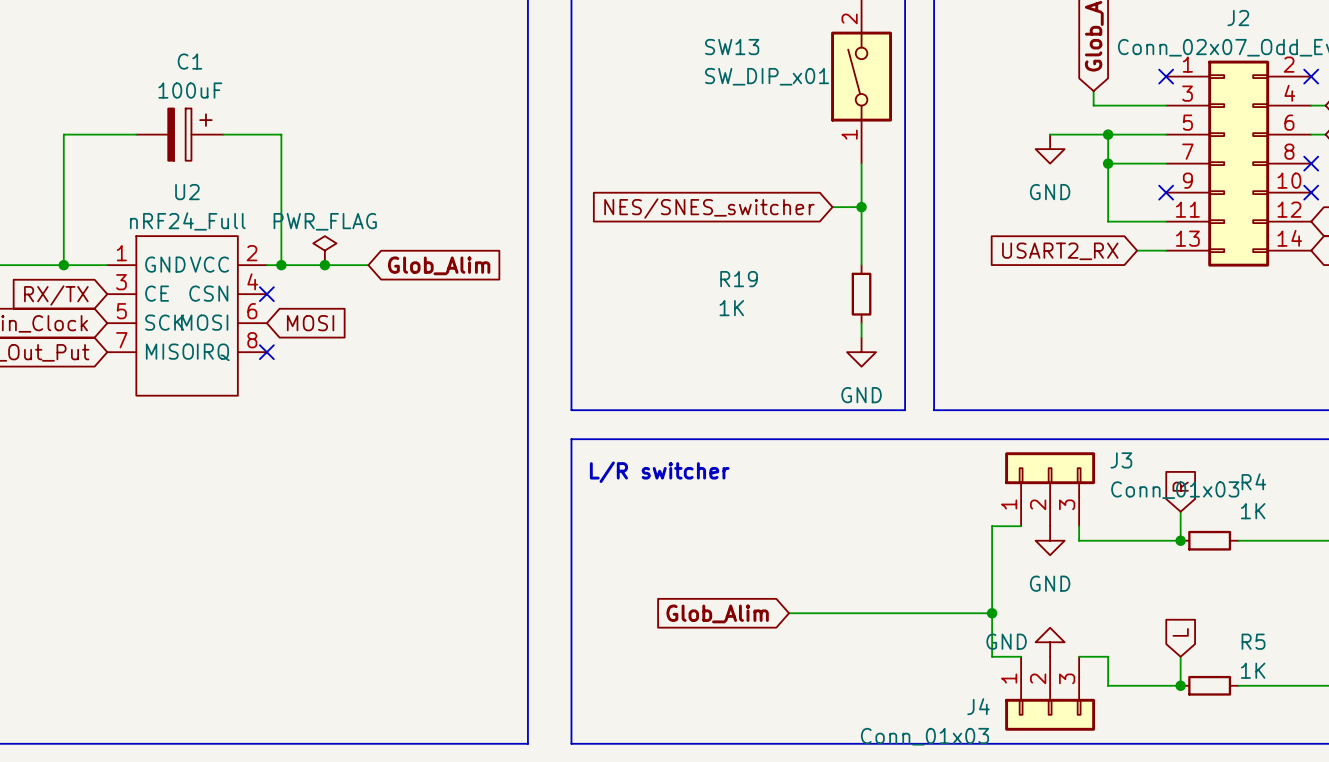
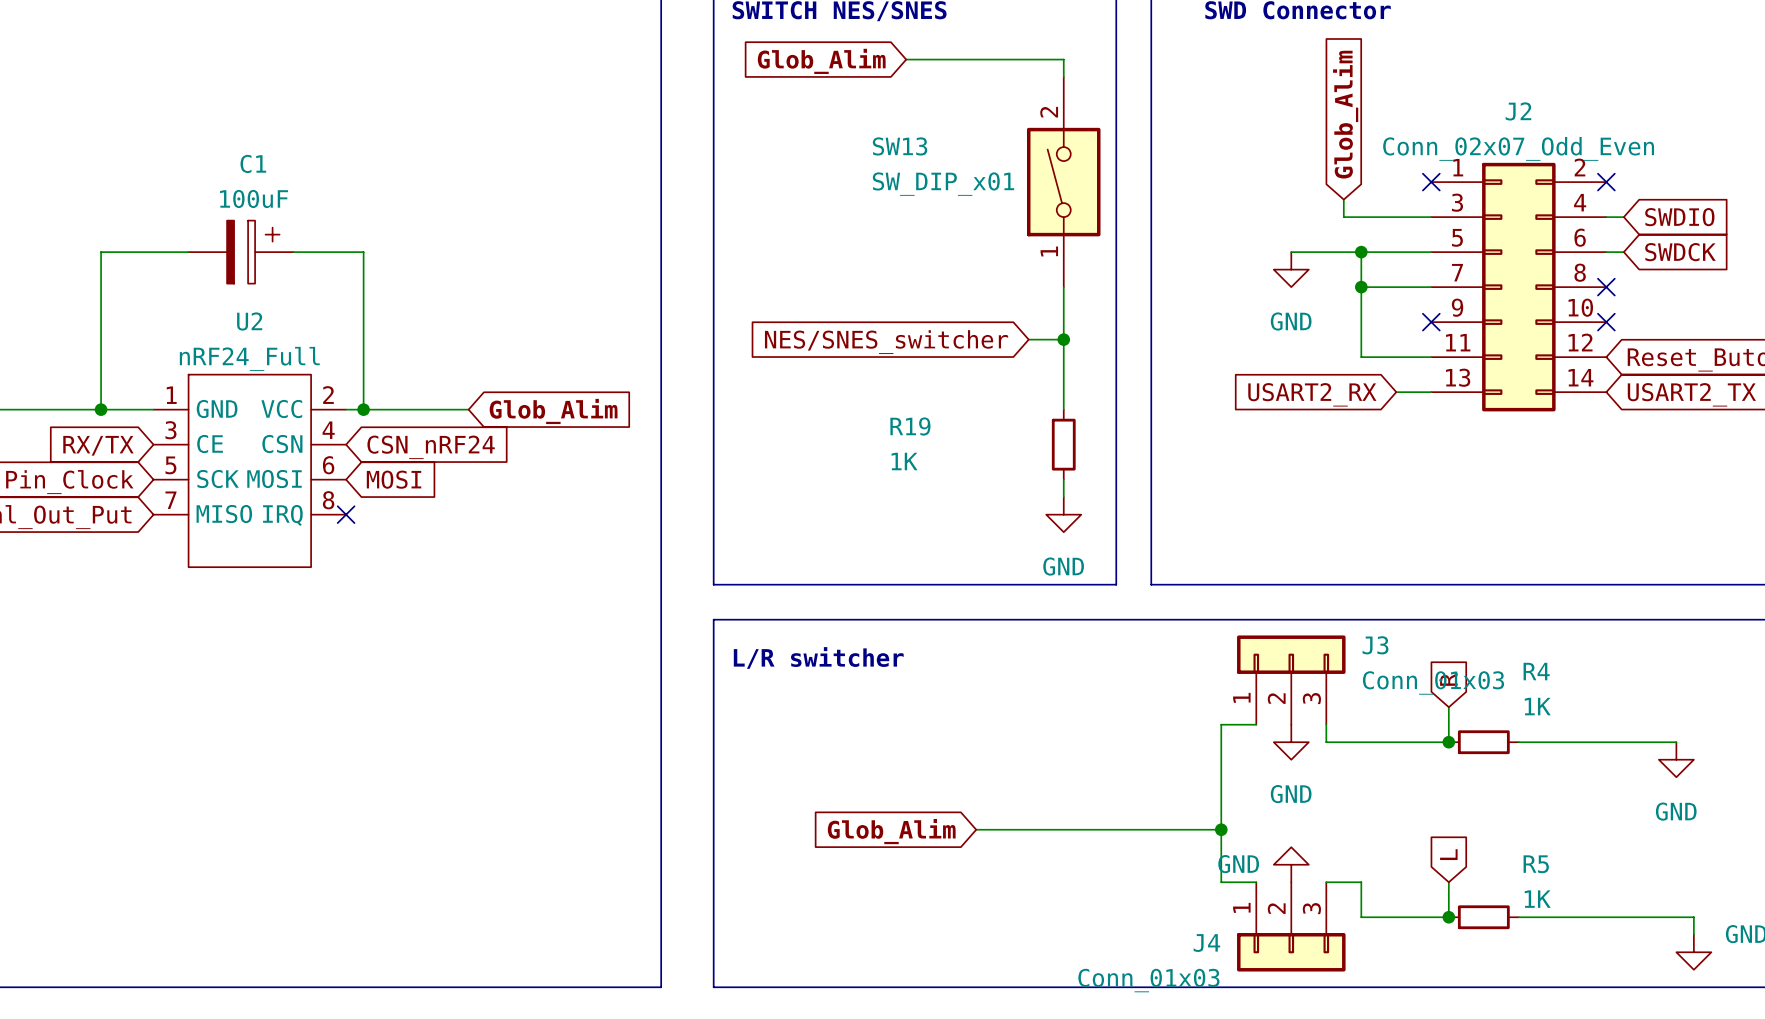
power symbol: PWR_FLAG (324, 250) -> none
junction: (324, 265) -> none
no-connect mark: (266, 294) -> none
global label: none -> CSN_nRF24 (431, 447)

